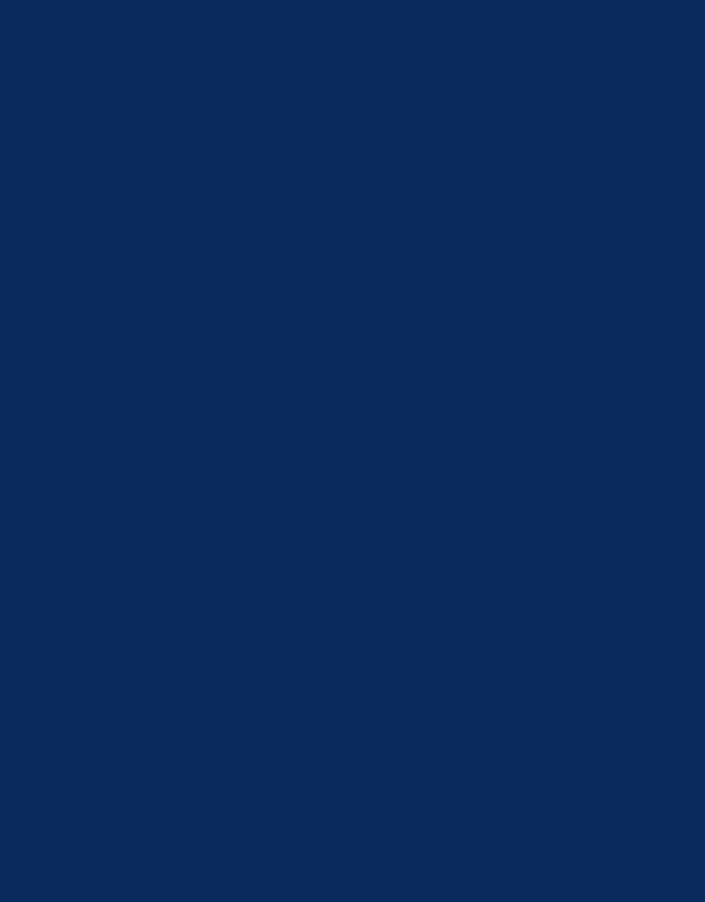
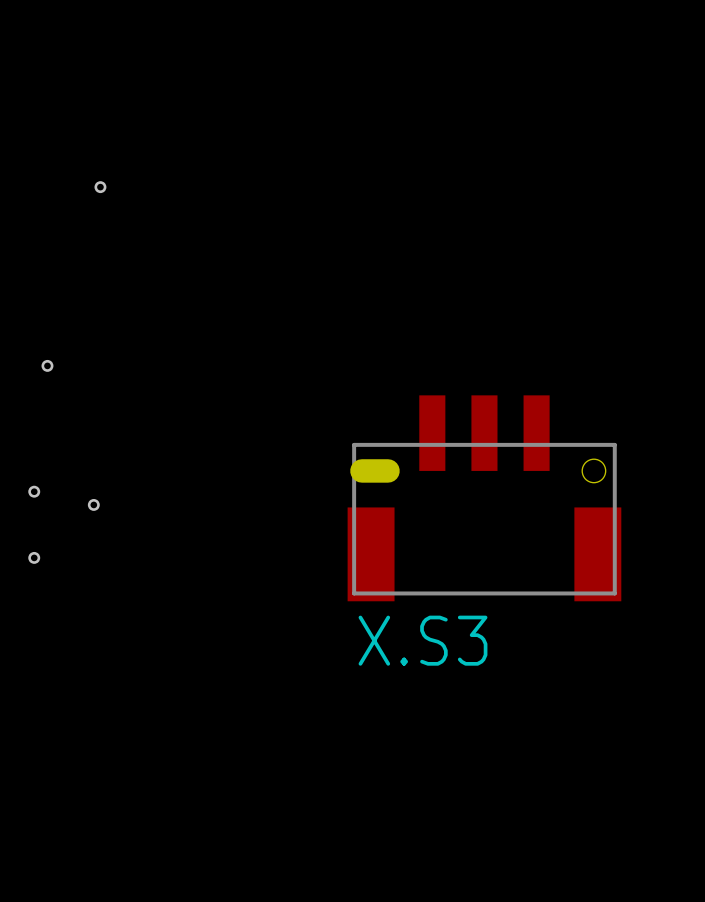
via: none -> (100, 187)
via: none -> (47, 365)
via: none -> (34, 491)
X.S3: none -> (484, 498)
via: none -> (93, 504)
via: none -> (34, 557)

